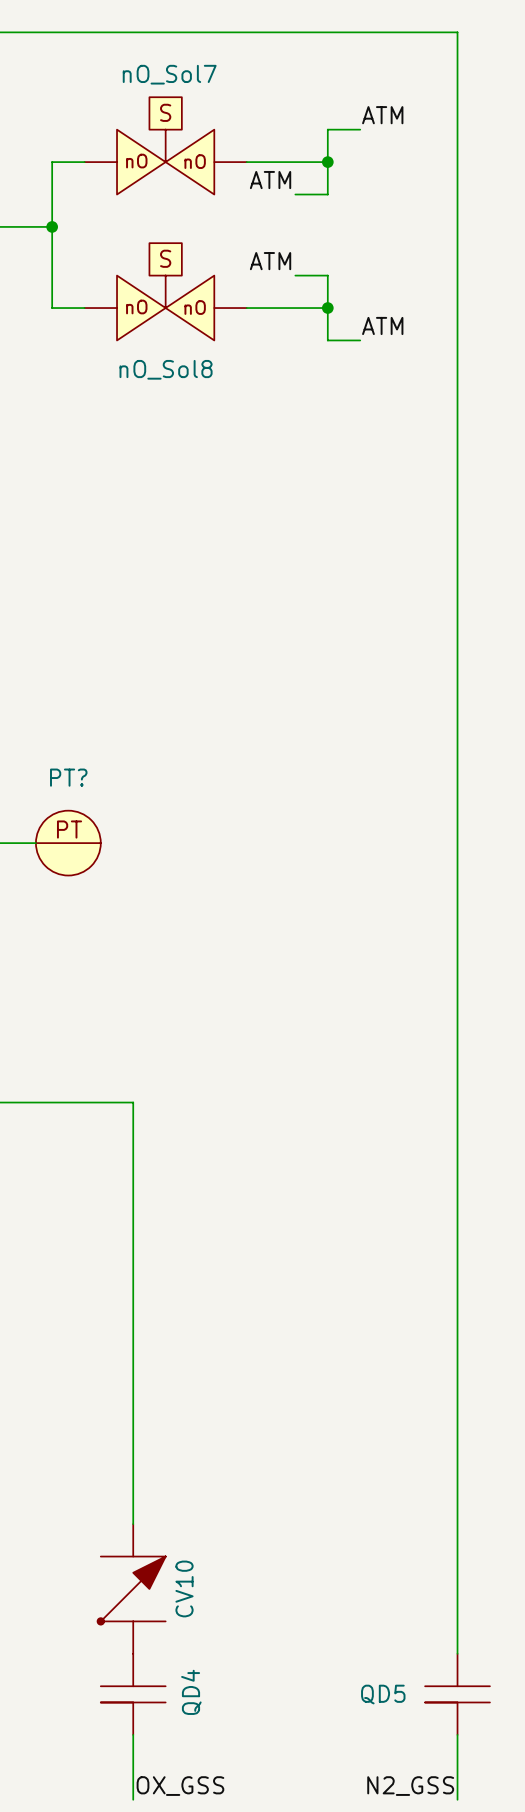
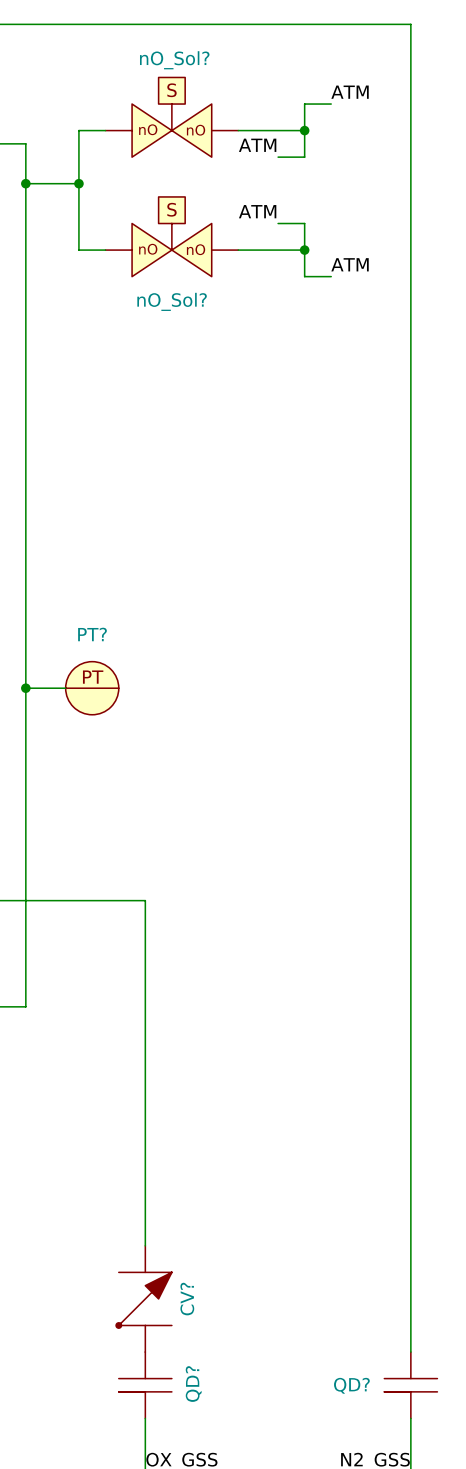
nO_Sol7 name: nO_Sol7 (169, 74) -> nO_Sol? (174, 60)
nO_Sol8 name: nO_Sol8 (166, 369) -> nO_Sol? (172, 301)
CV10 name: CV10 (184, 1588) -> CV? (187, 1299)
QD4 name: QD4 (191, 1692) -> QD? (193, 1384)
QD5 name: QD5 (383, 1694) -> QD? (351, 1385)

